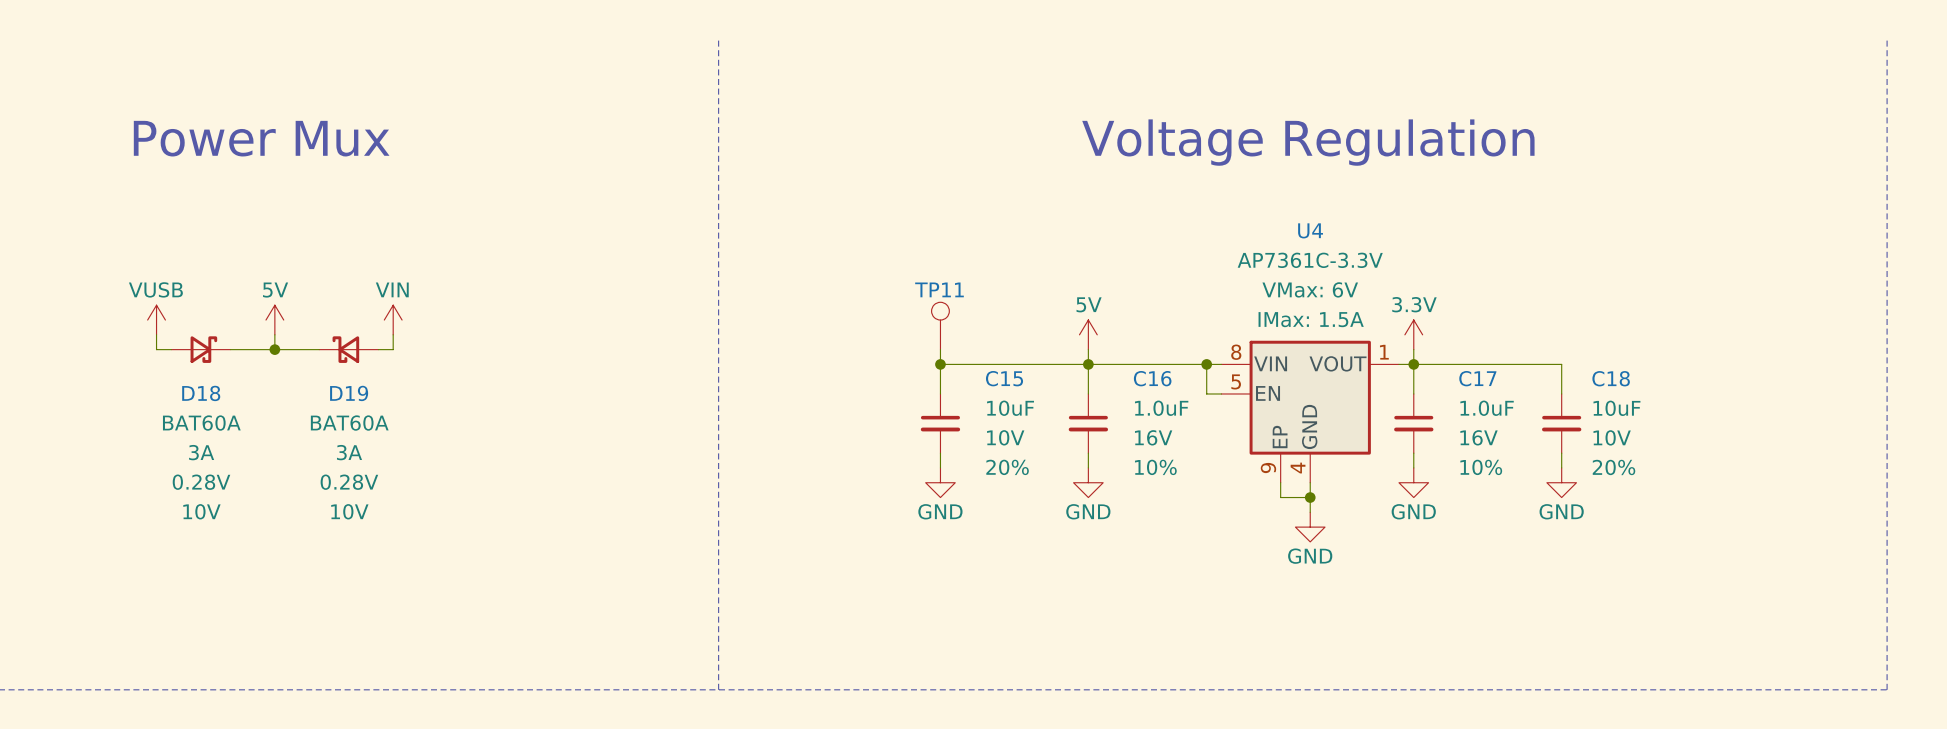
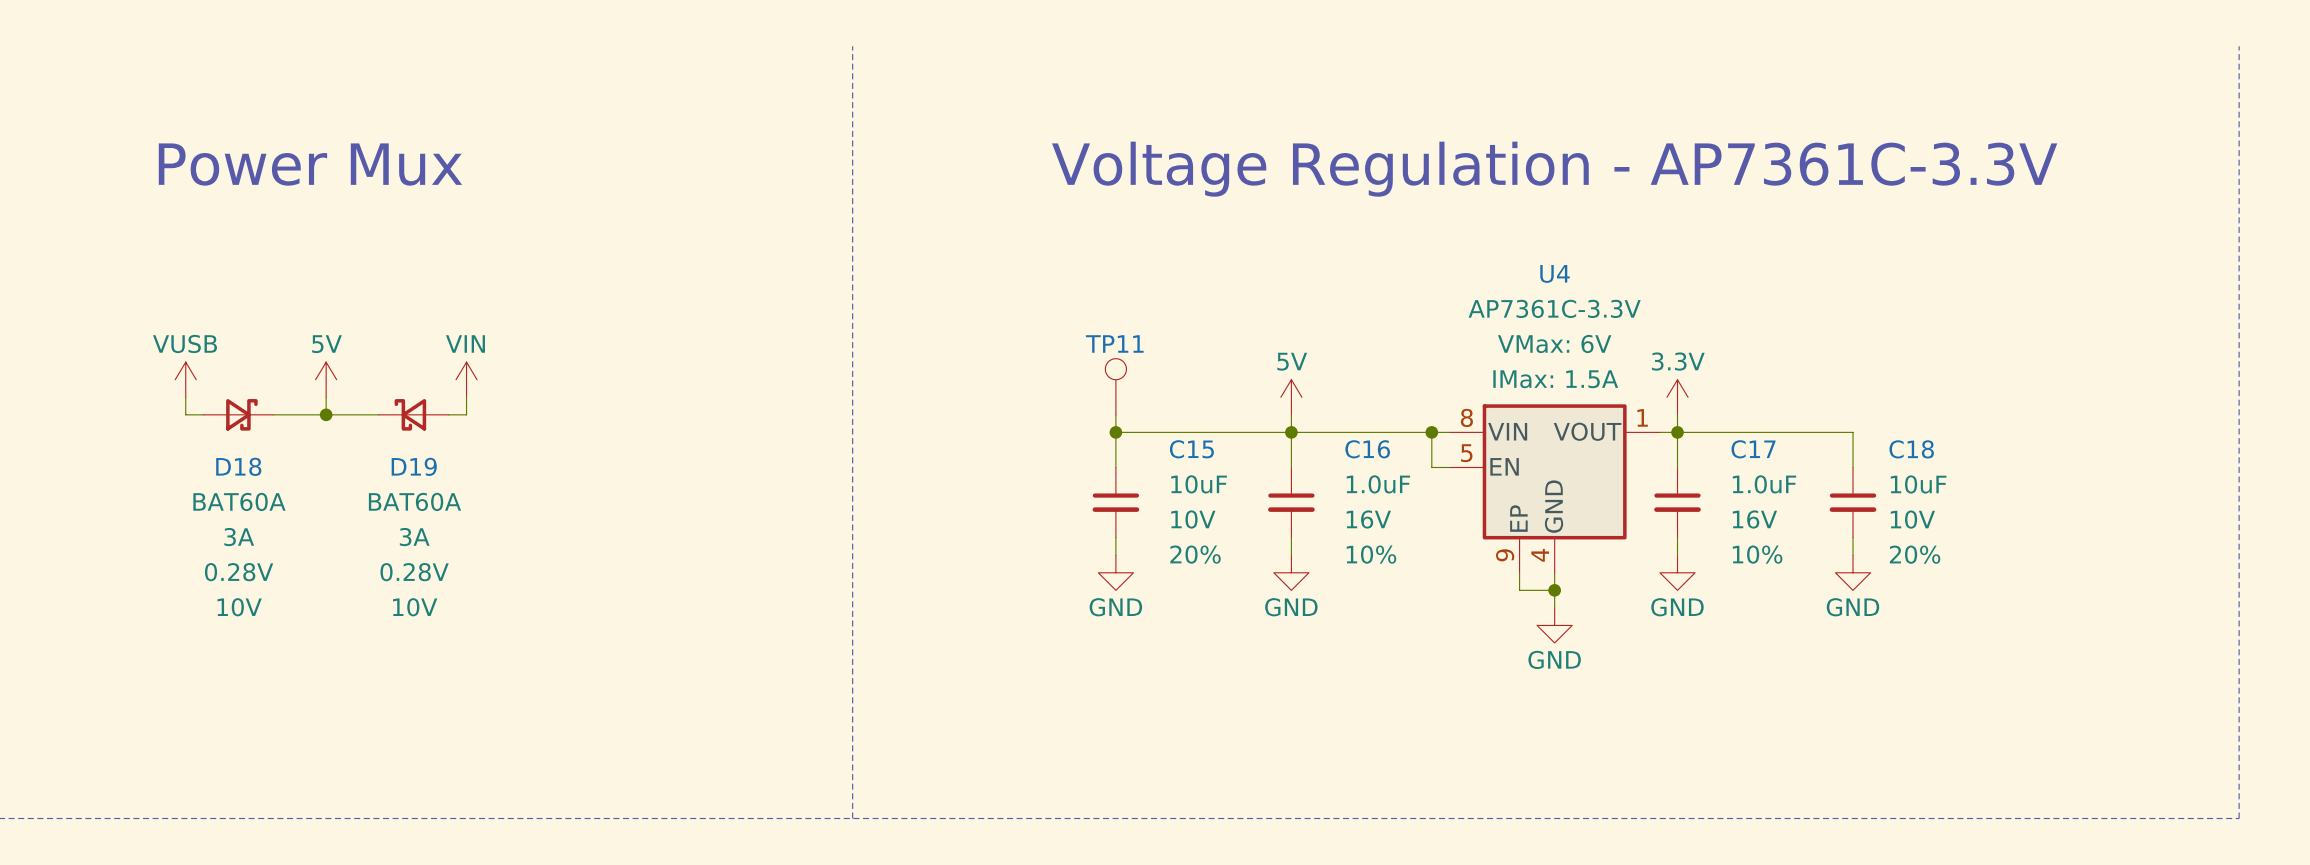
text: Voltage Regulation (1308, 142) -> Voltage Regulation - AP7361C-3.3V (1554, 169)

